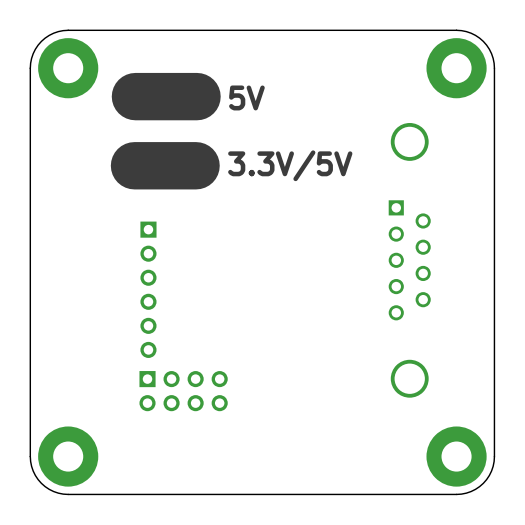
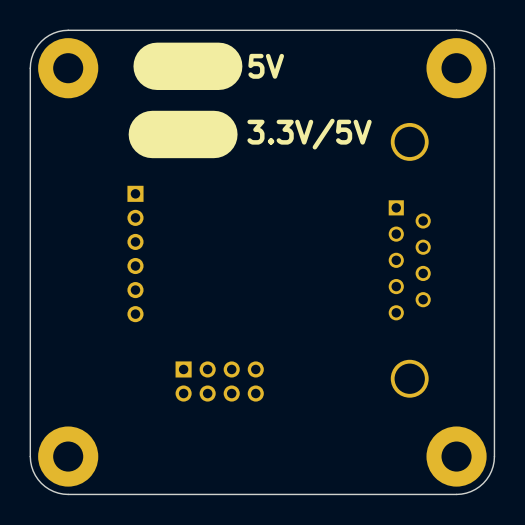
line: (197, 96) (135, 96) -> (218, 66) (157, 66)
text position: 5V (246, 97) -> 5V (266, 66)
line: (196, 165) (134, 165) -> (213, 134) (152, 134)
text position: 3.3V/5V (290, 165) -> 3.3V/5V (309, 134)
part position: (148, 289) -> (135, 253)
part position: (183, 391) -> (219, 381)

